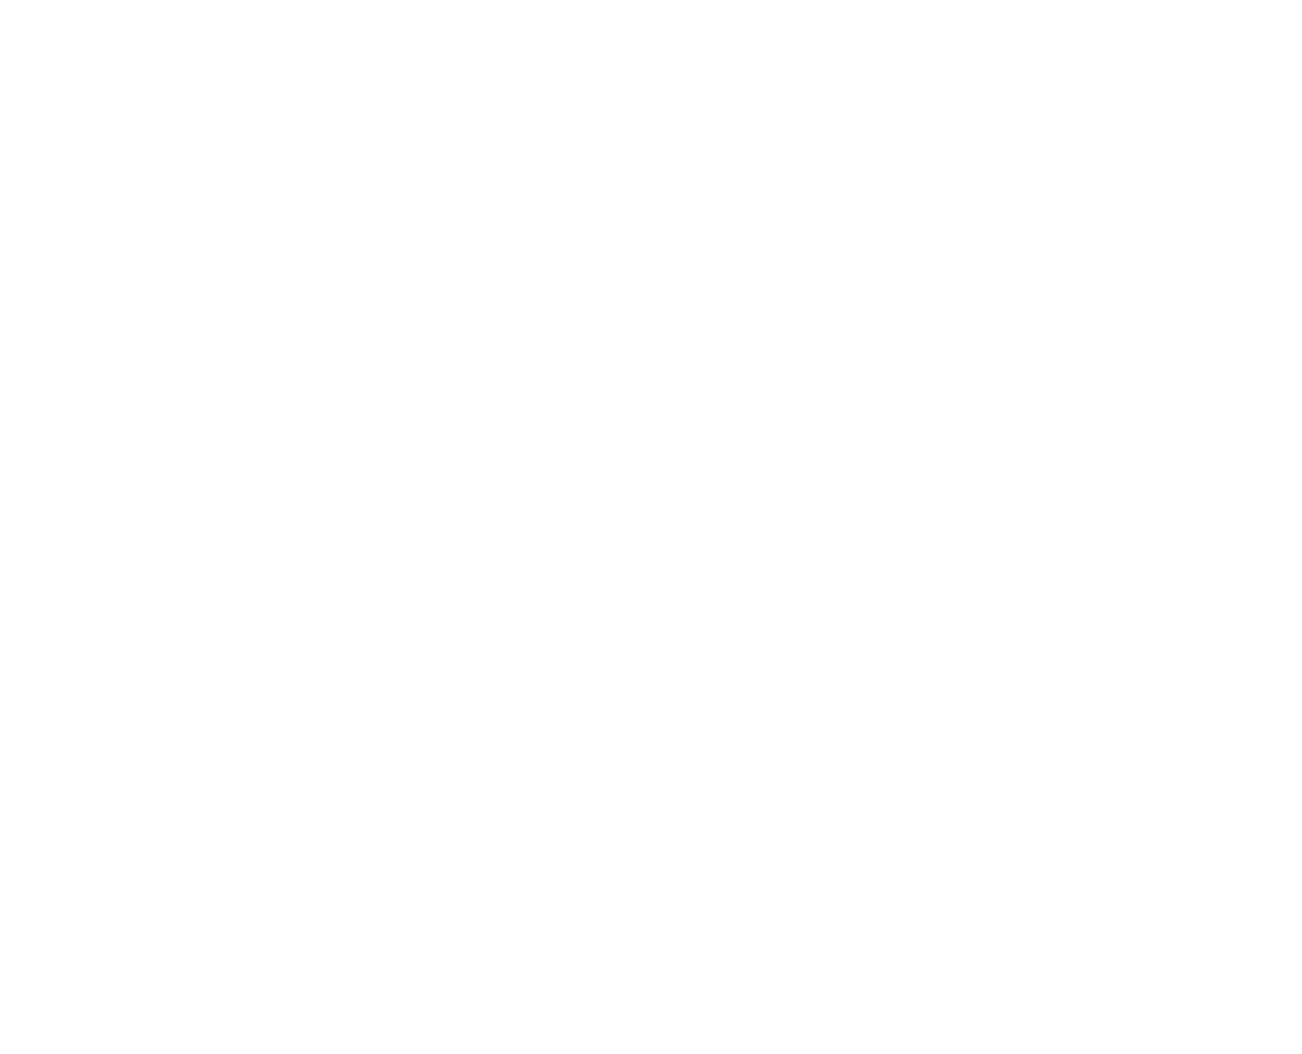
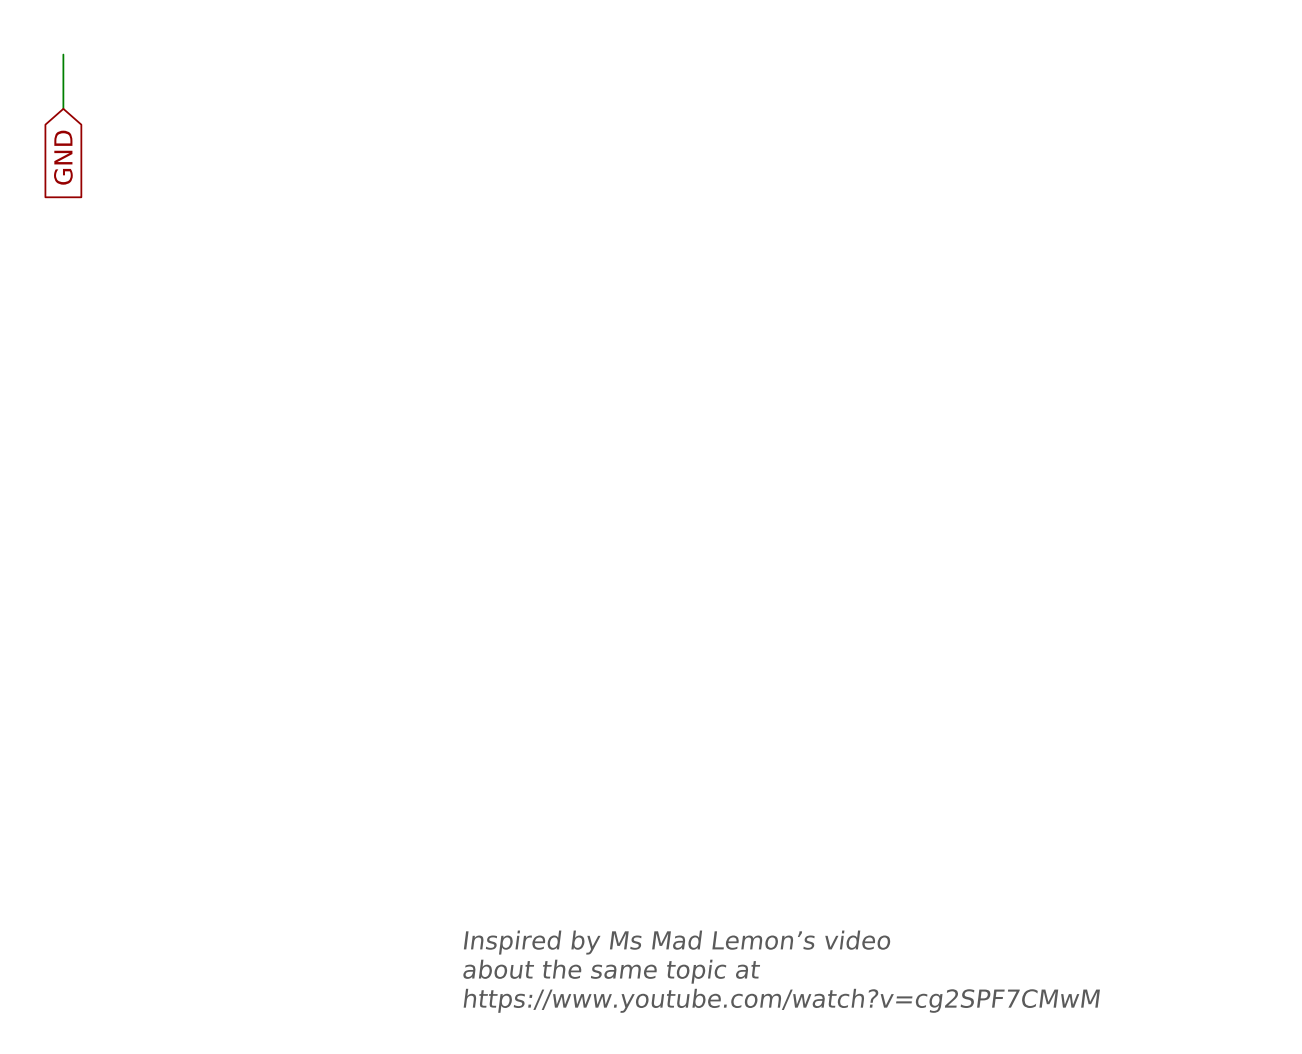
wire: none -> (63, 54) (63, 108)
global label: none -> GND (63, 157)
text: none -> Inspired by Ms Mad Lemon’s video (677, 942)
text: none -> about the same topic at (611, 971)
text: none -> https://www.youtube.com/watch?v=cg2SPF7CMwM (781, 1000)

